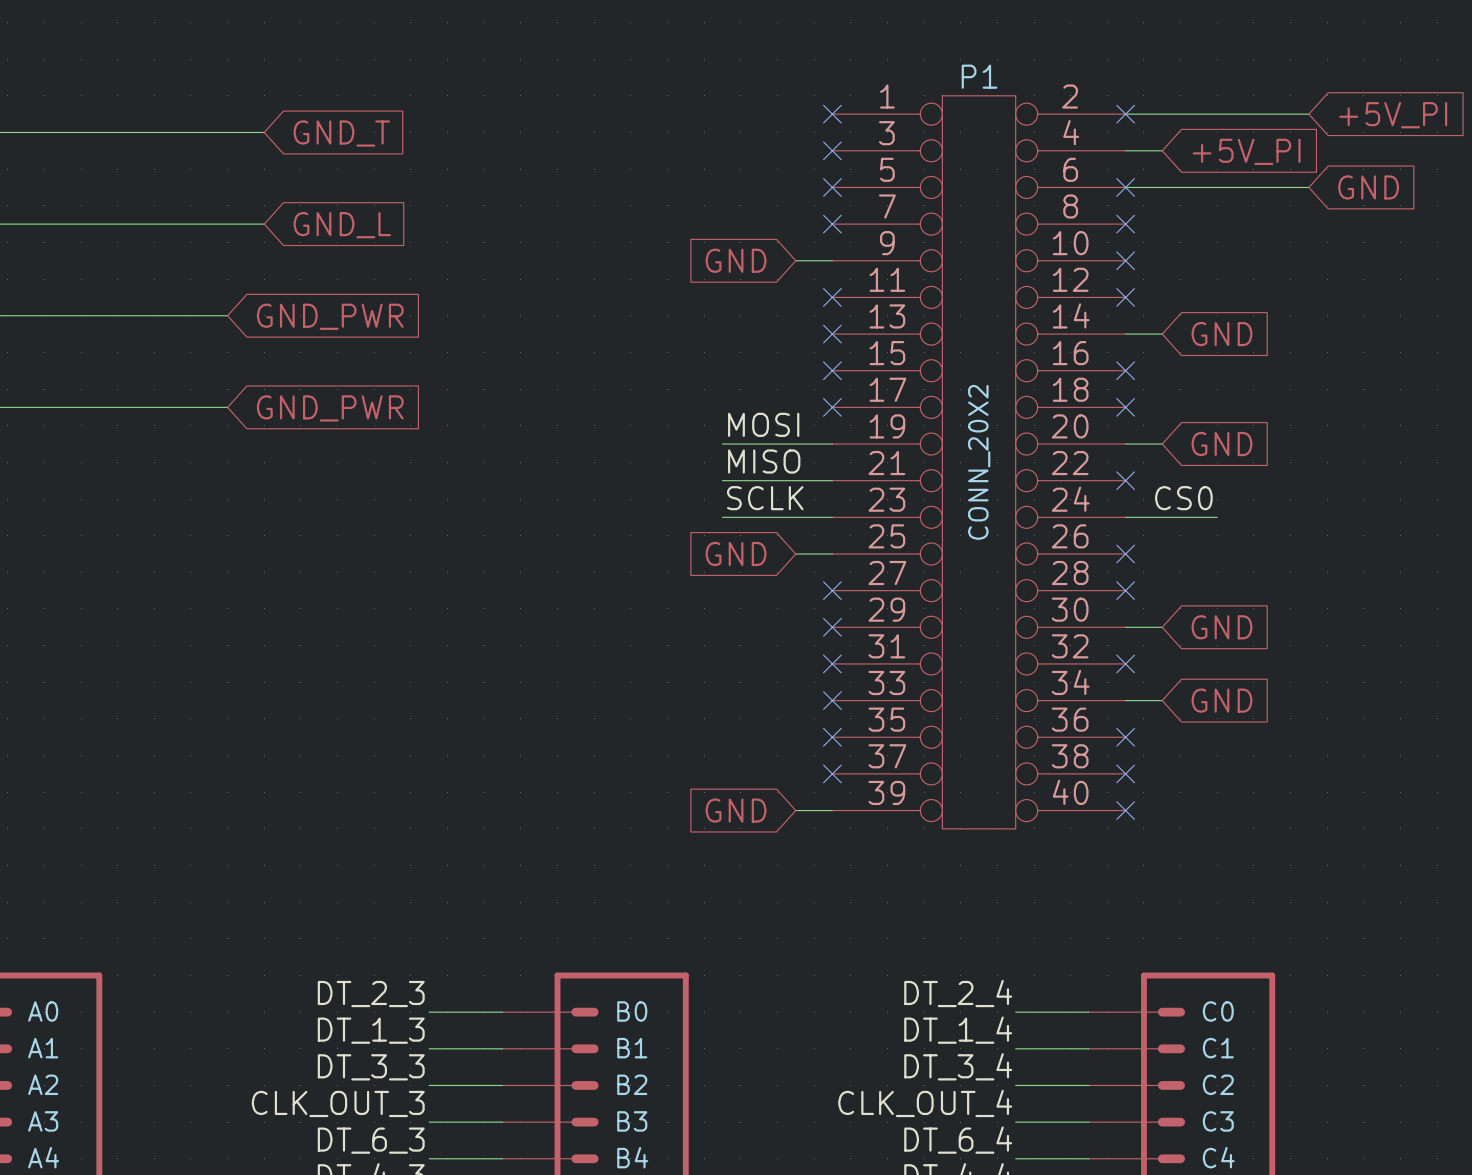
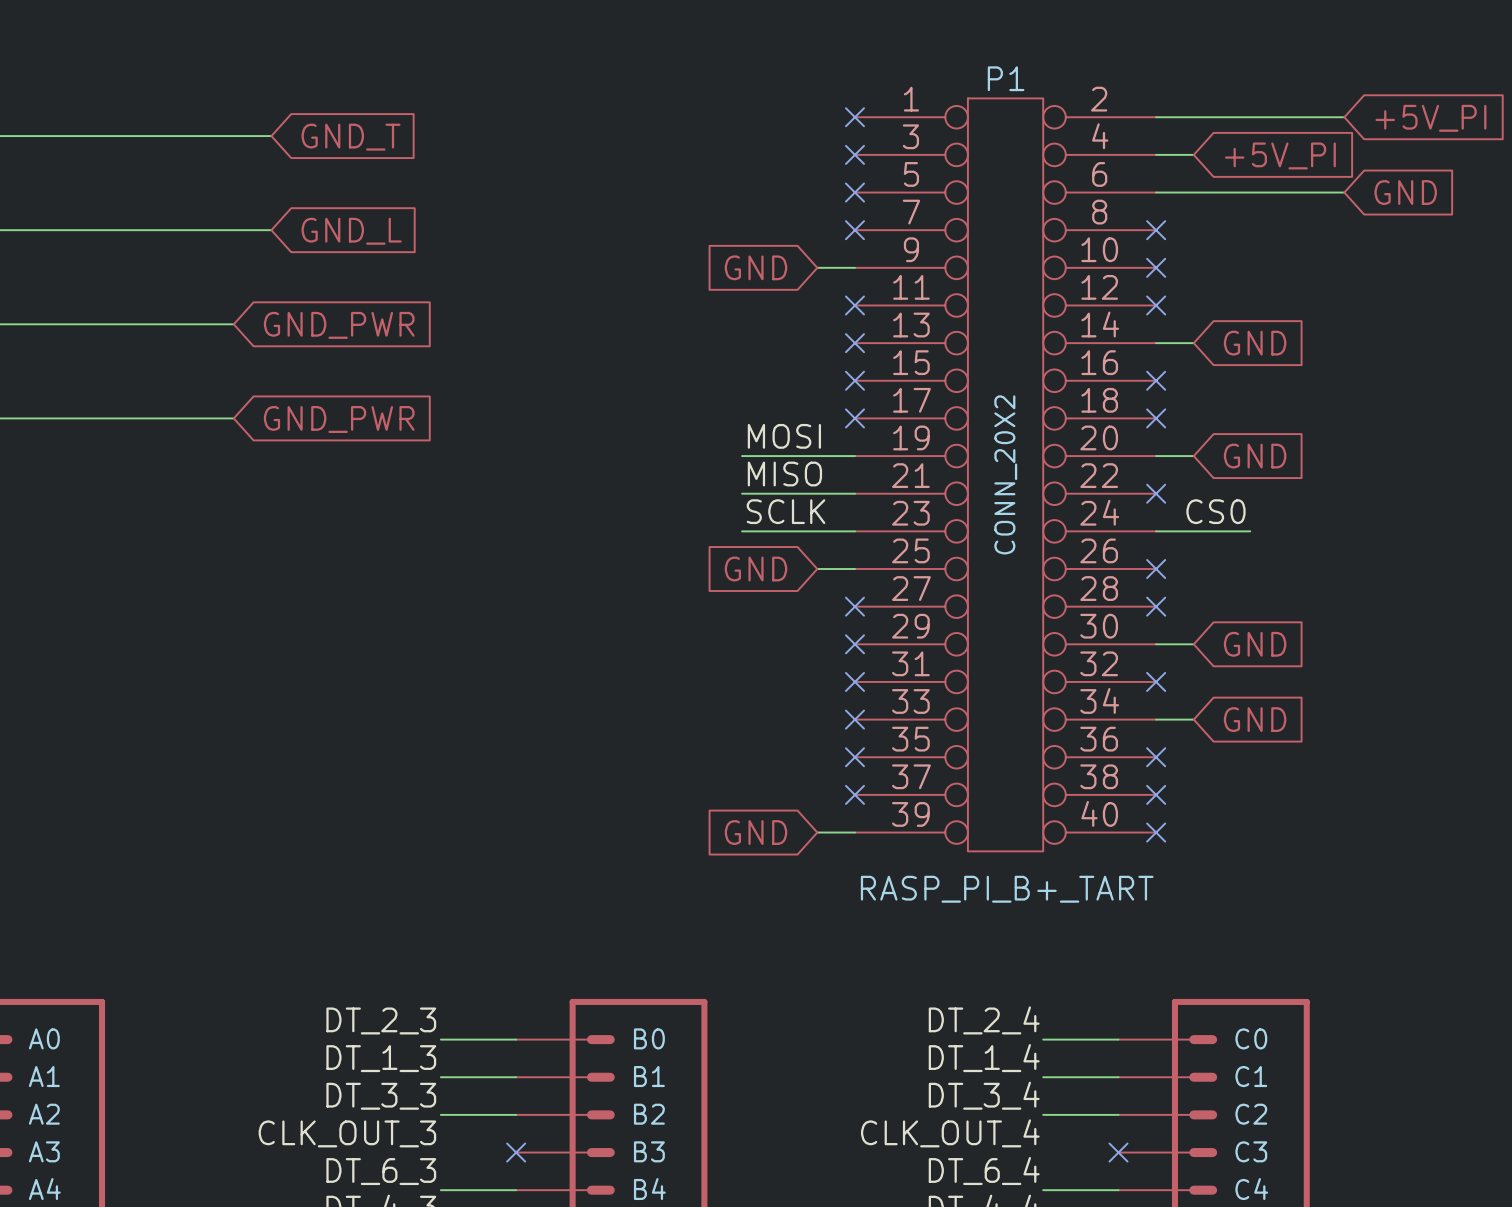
no-connect mark: (1125, 114) -> none
no-connect mark: (1125, 187) -> none
P1 text: none -> RASP_PI_B+_TART (1007, 889)
wire: (429, 1122) (502, 1122) -> none
no-connect mark: none -> (516, 1152)
wire: (1015, 1122) (1088, 1122) -> none
no-connect mark: none -> (1118, 1152)

